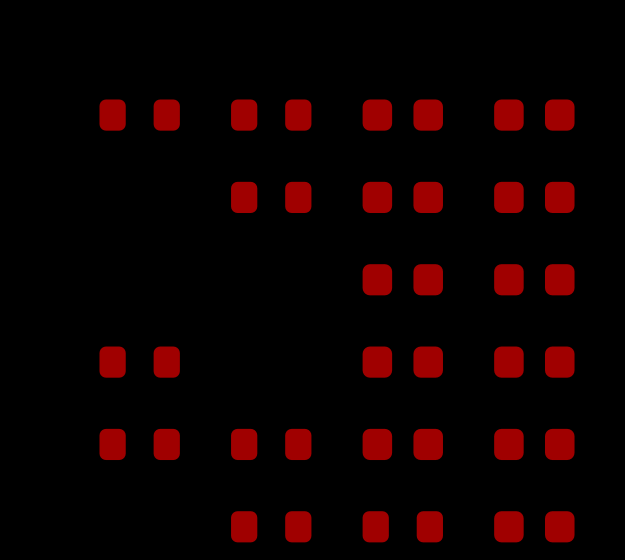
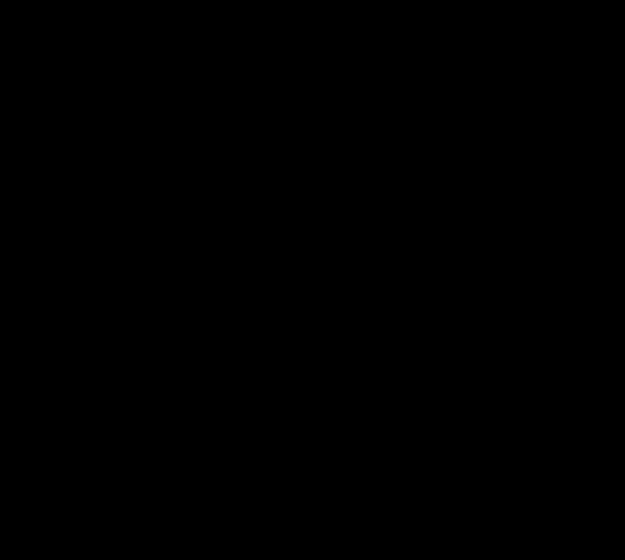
part: (139, 115) -> none
part: (271, 115) -> none
part: (402, 115) -> none
part: (534, 115) -> none
part: (271, 197) -> none
part: (402, 197) -> none
part: (534, 197) -> none
part: (402, 279) -> none
part: (534, 279) -> none
part: (139, 362) -> none
part: (402, 362) -> none
part: (534, 362) -> none
part: (139, 444) -> none
part: (271, 444) -> none
part: (402, 444) -> none
part: (534, 444) -> none
part: (271, 526) -> none
part: (402, 526) -> none
part: (534, 526) -> none

